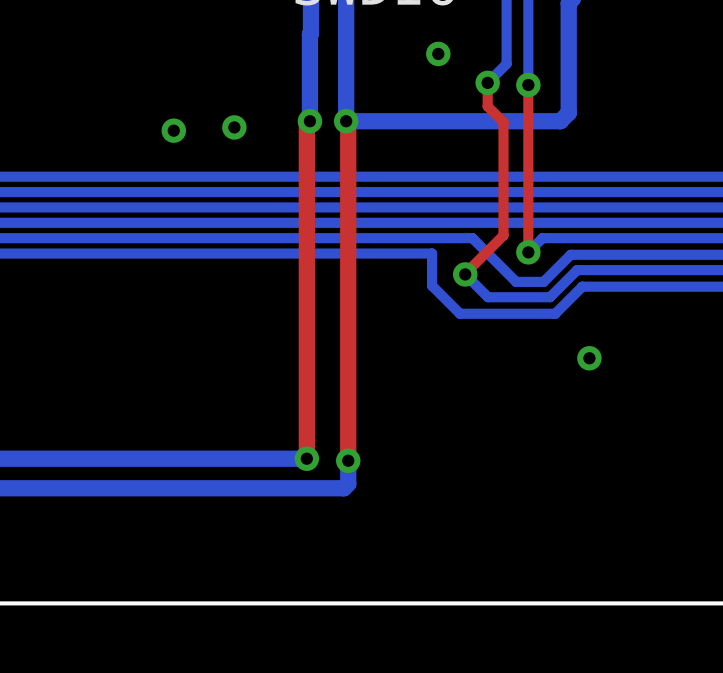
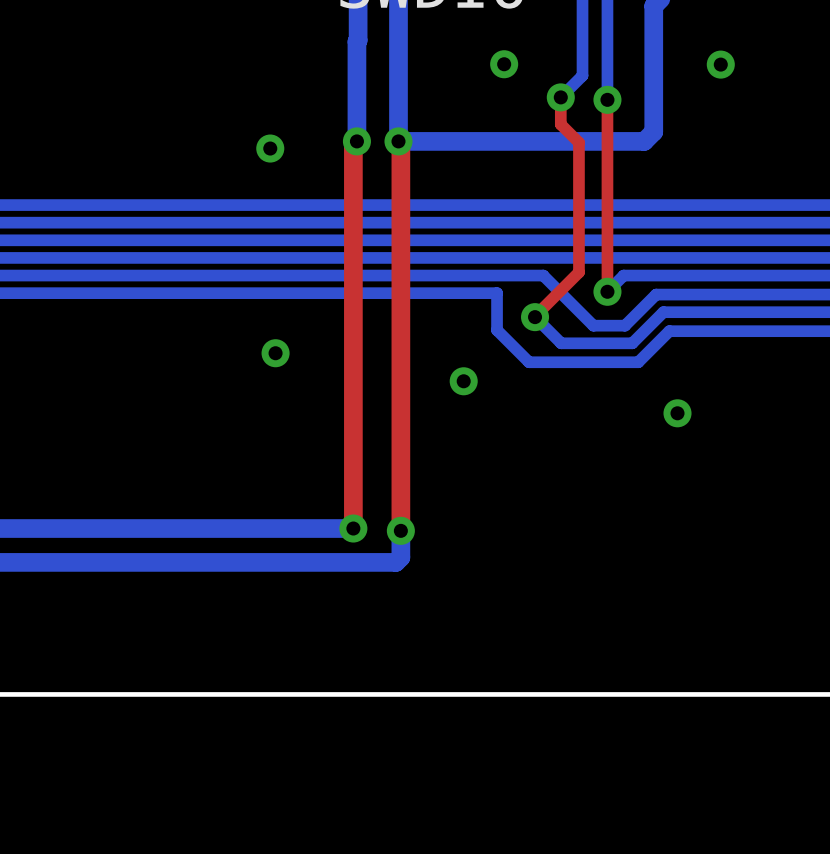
via: none -> (720, 64)
via: (173, 130) -> none
via: none -> (275, 353)
via: none -> (463, 381)

